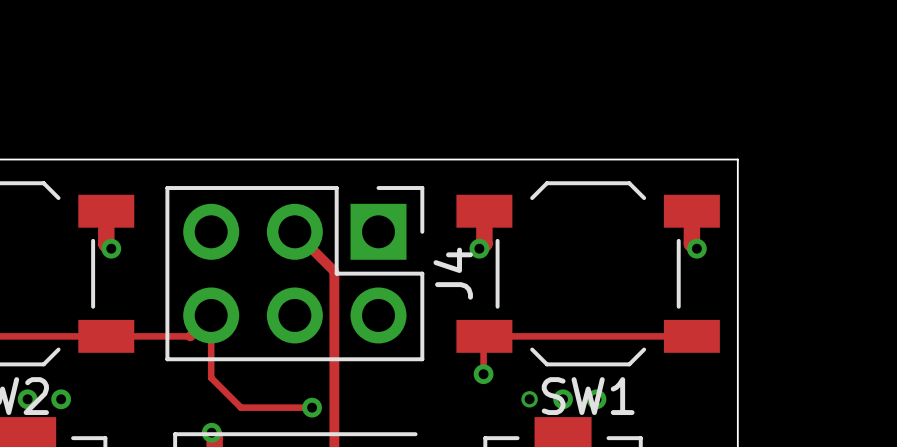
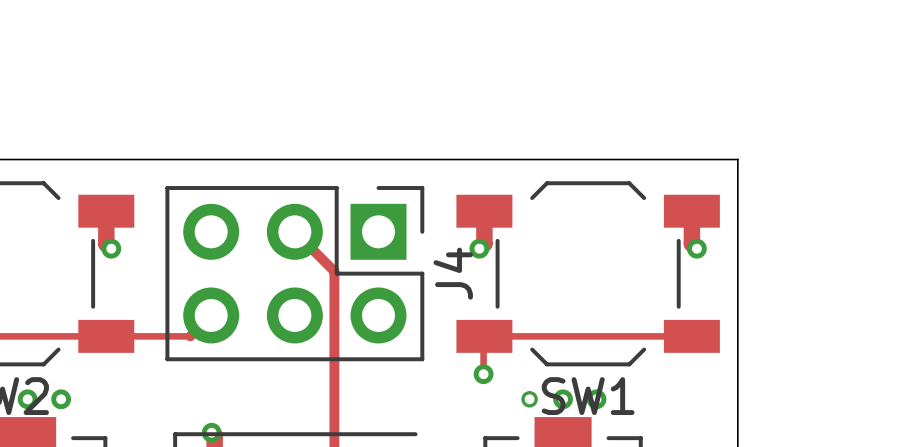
track: (211, 315) (211, 377) (240, 407) (312, 407) -> none
via: (312, 407) -> none

